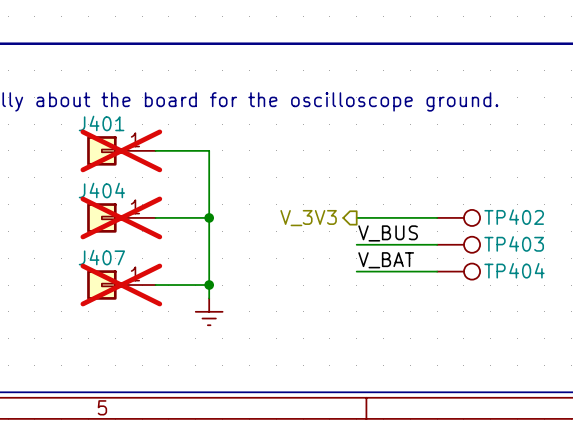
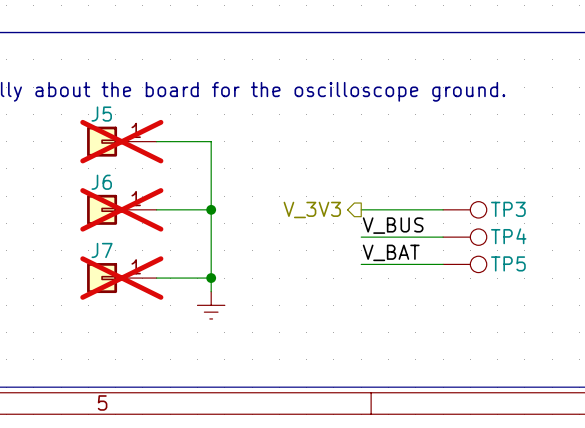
J401 name: J401 (101, 123) -> J5 (101, 114)
J404 name: J404 (101, 190) -> J6 (101, 182)
TP402 name: TP402 (514, 217) -> TP3 (508, 209)
TP403 name: TP403 (514, 243) -> TP4 (508, 236)
J407 name: J407 (101, 257) -> J7 (102, 250)
TP404 name: TP404 (514, 270) -> TP5 (508, 263)

